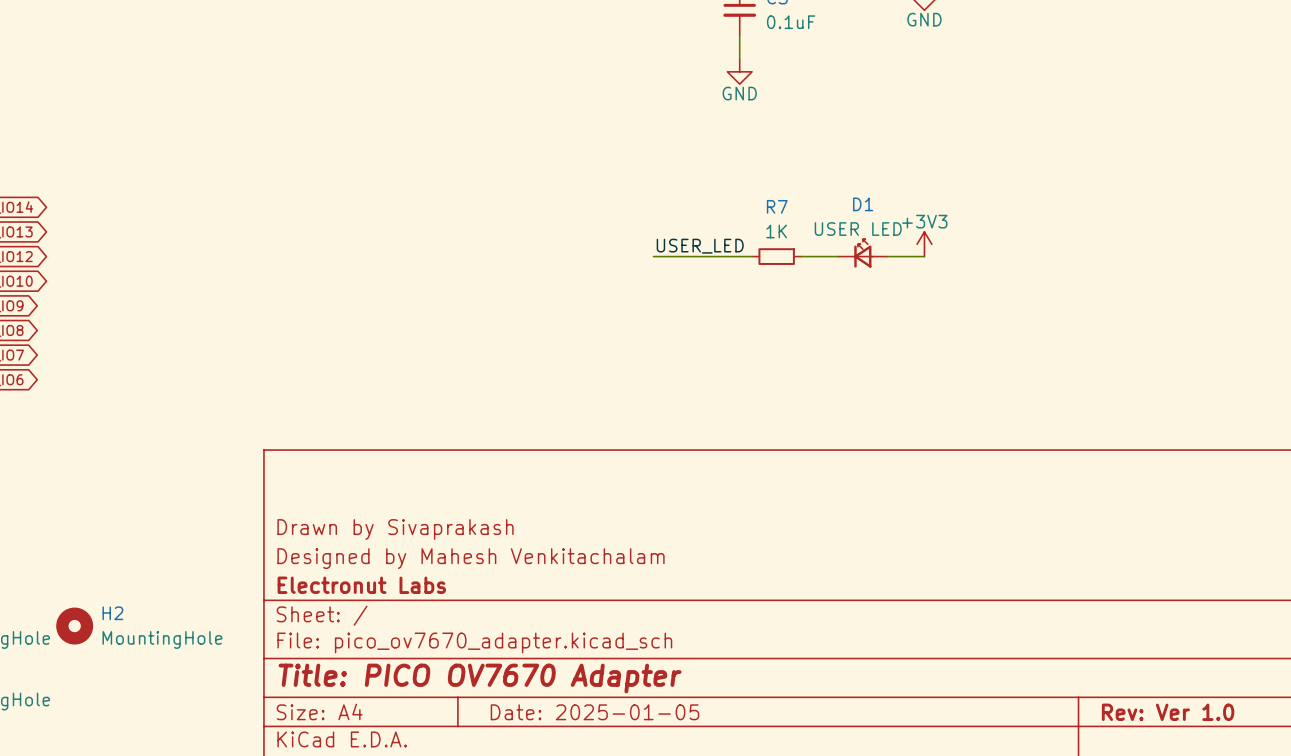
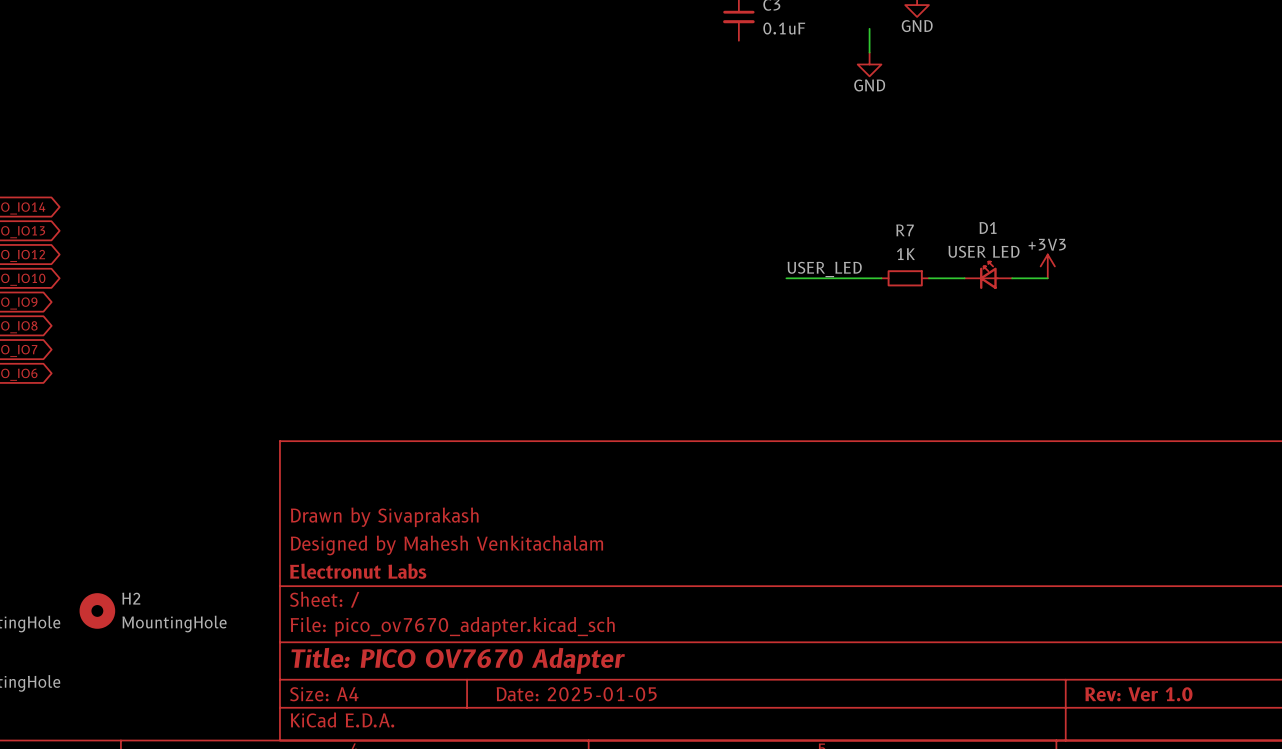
wire: (739, 34) (739, 59) -> (869, 28) (869, 52)
power symbol position: GND (739, 71) -> GND (869, 64)
power symbol position: +3V3 (924, 244) -> +3V3 (1047, 266)
label position: USER_LED (700, 246) -> USER_LED (824, 269)
D1 position: (862, 253) -> (988, 275)
wire: (653, 256) (752, 256) -> (786, 278) (881, 278)
R7 position: (776, 256) -> (905, 278)
wire: (801, 256) (838, 256) -> (928, 278) (964, 278)
wire: (887, 256) (924, 256) -> (1012, 278) (1047, 278)

